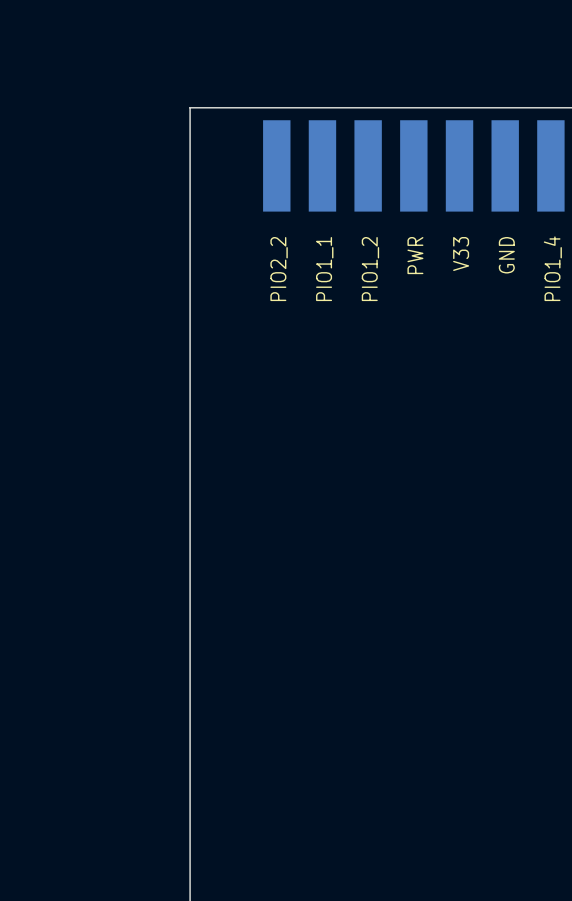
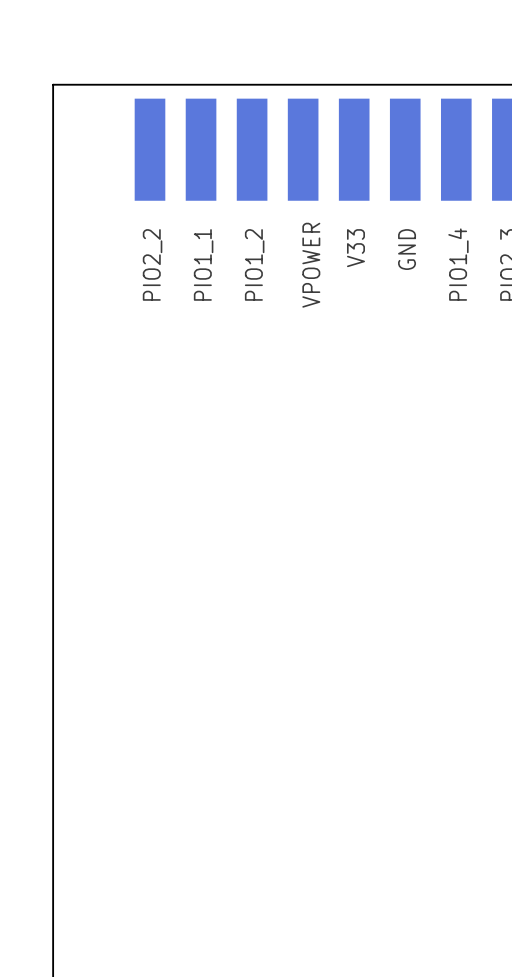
part value: PWR (415, 255) -> VPOWER (311, 265)

